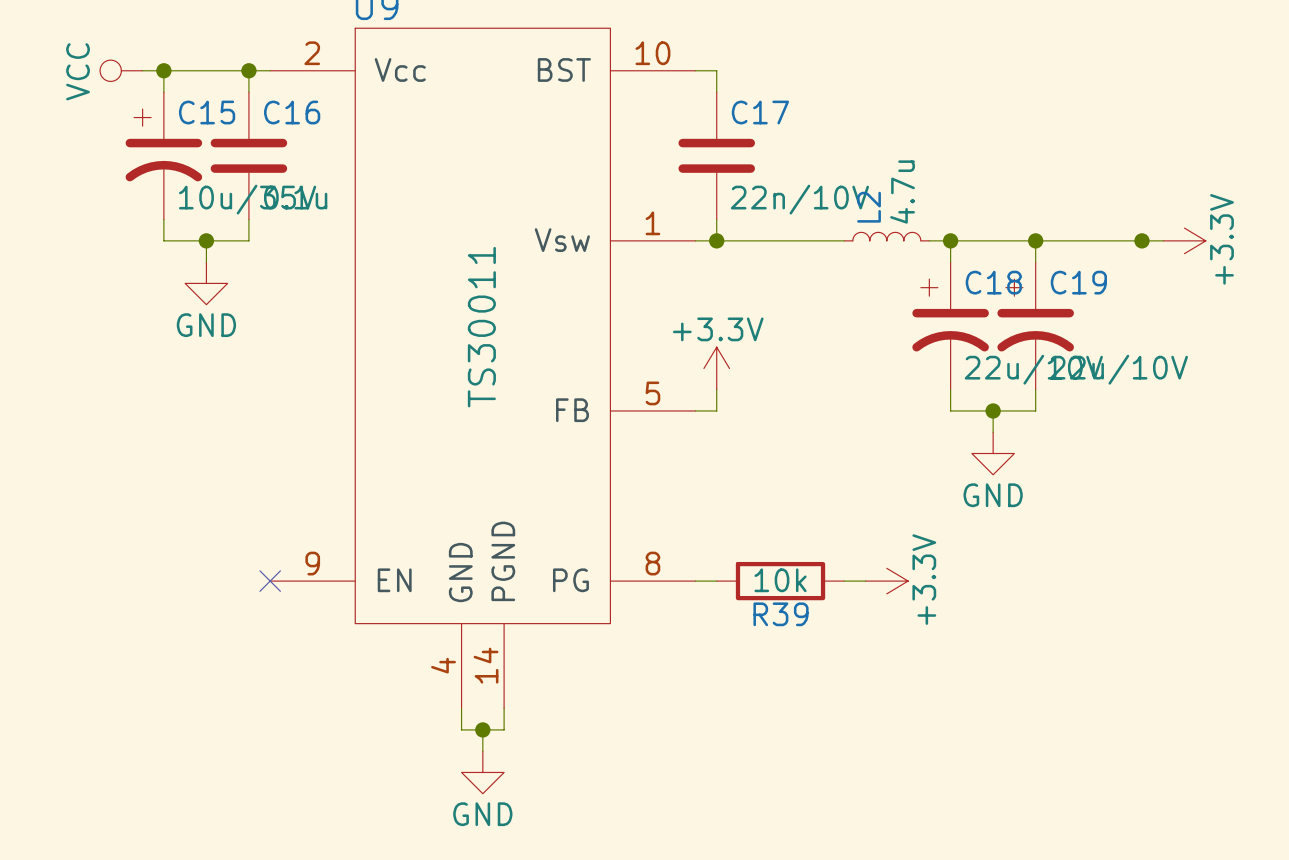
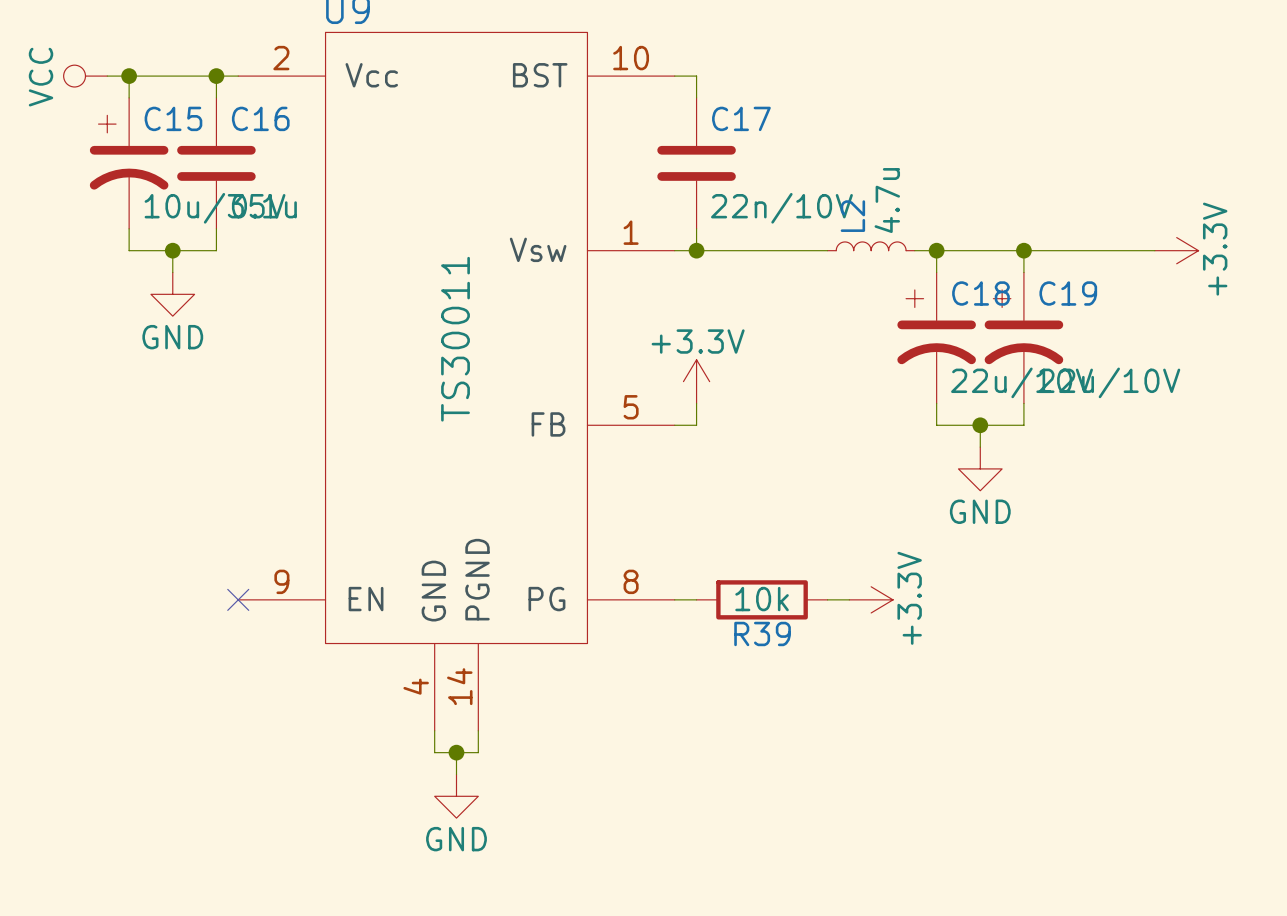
junction: (1141, 240) -> none

